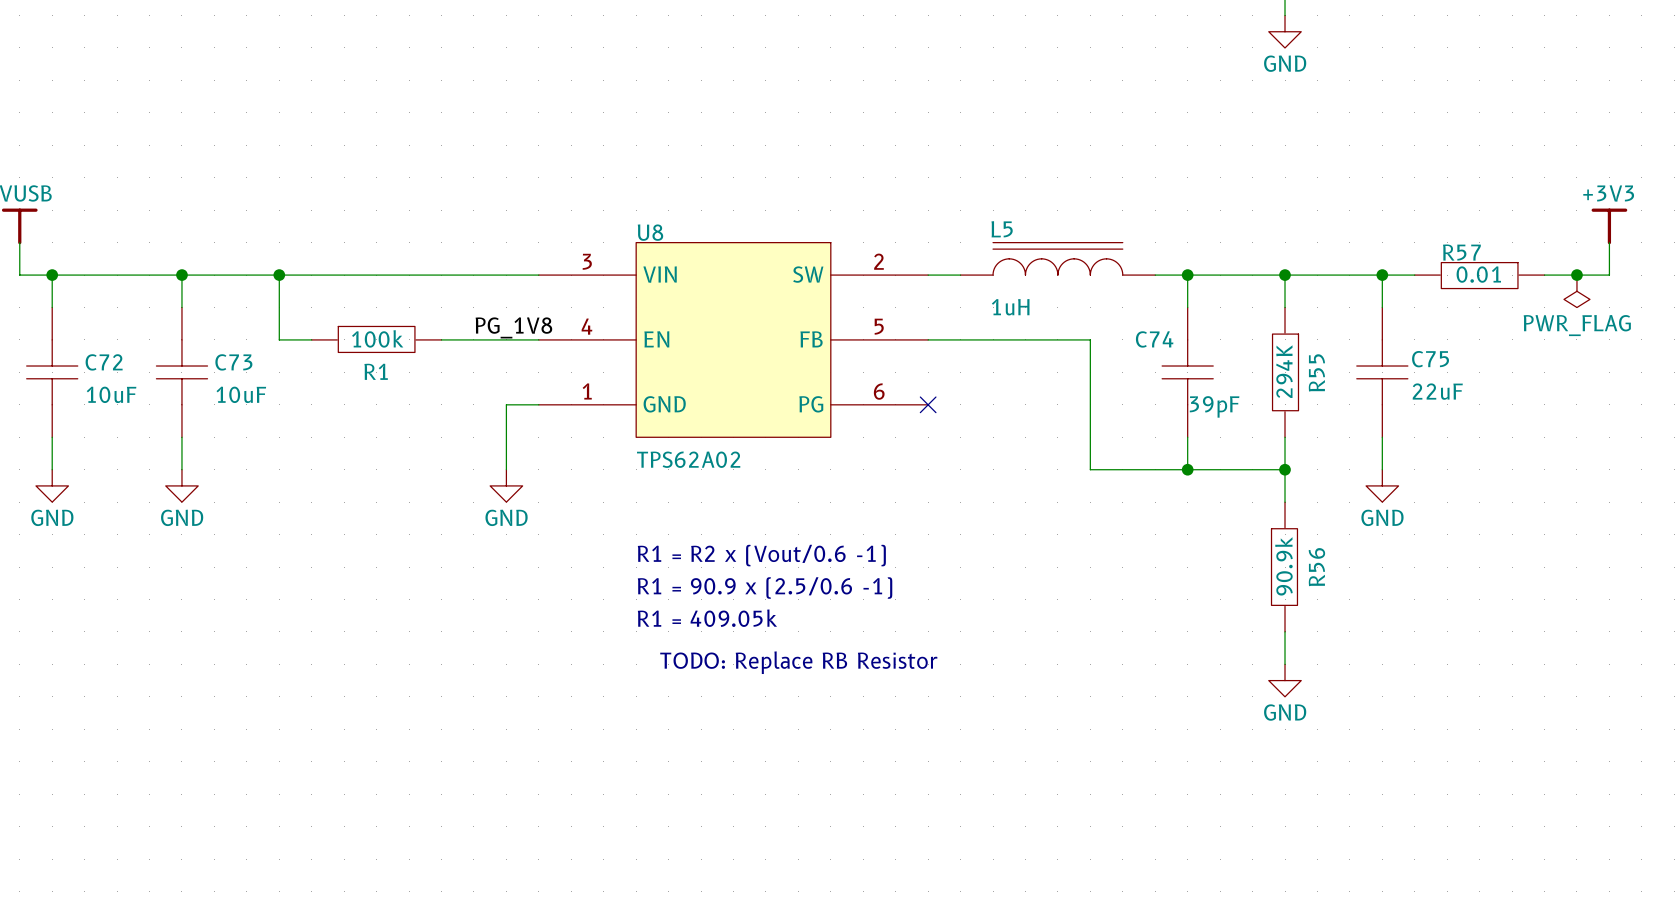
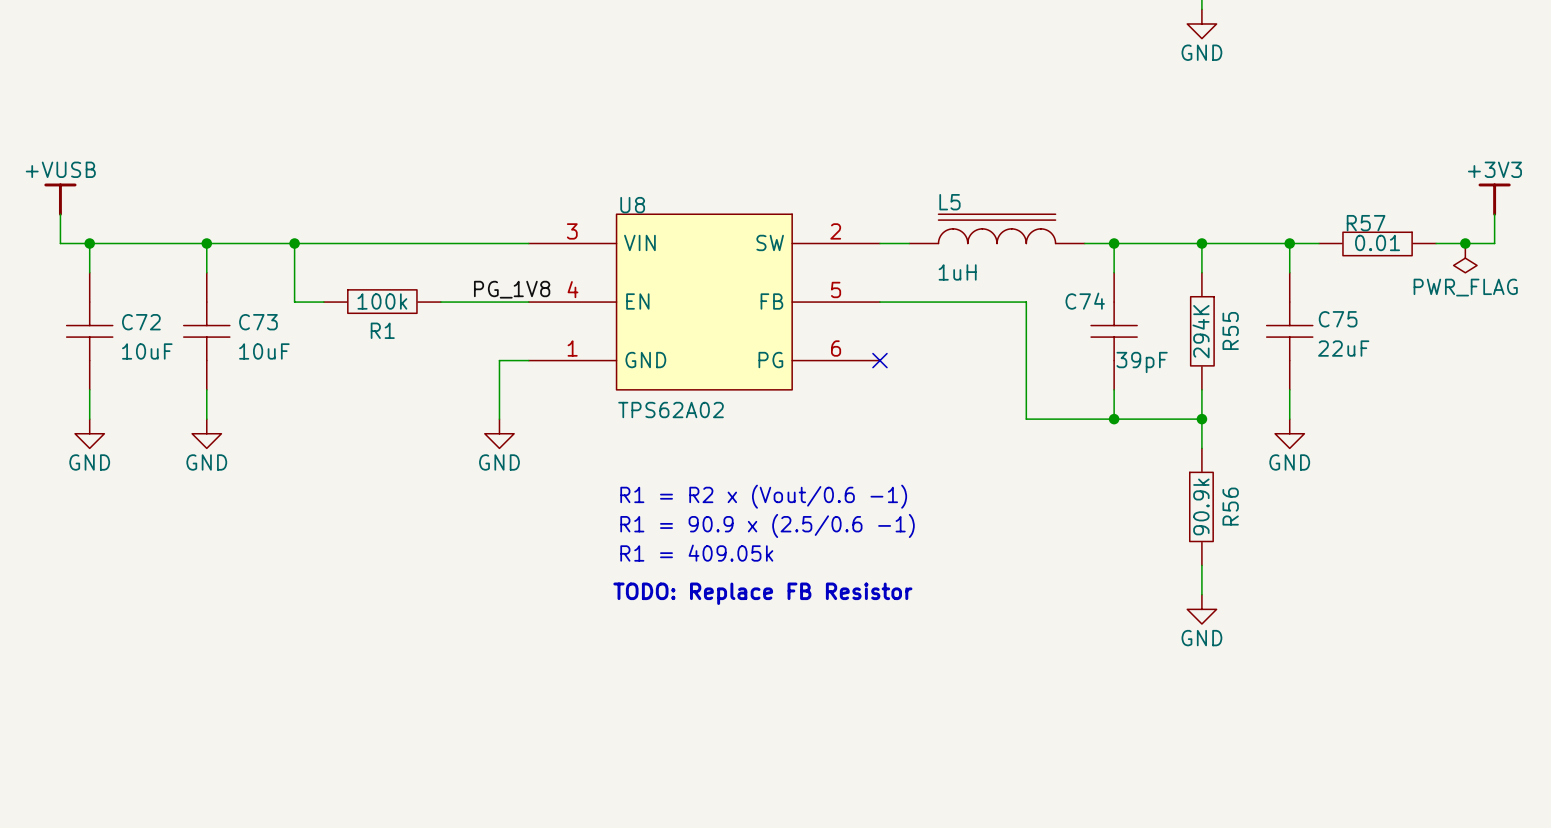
text: TODO: Replace RB Resistor (798, 662) -> TODO: Replace FB Resistor (762, 593)

